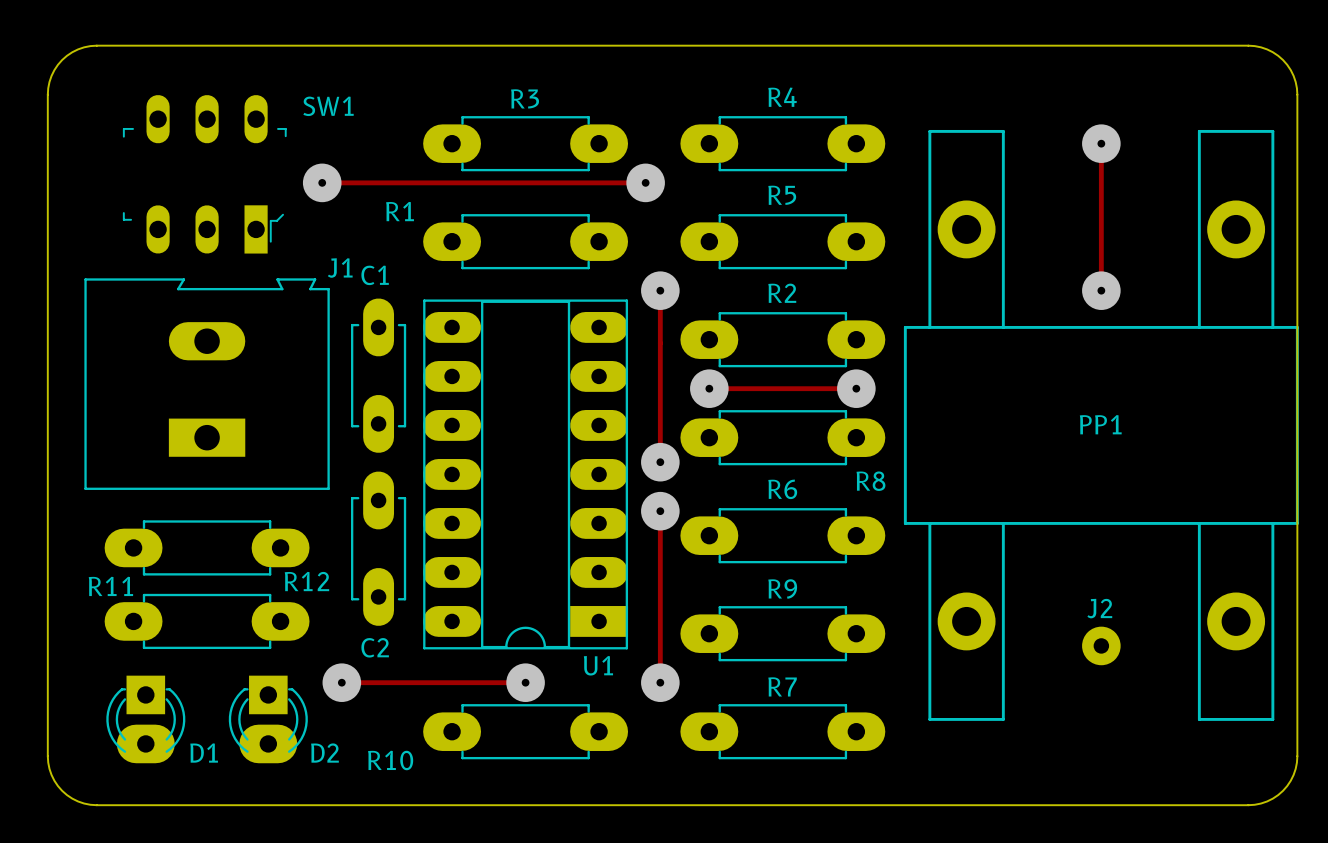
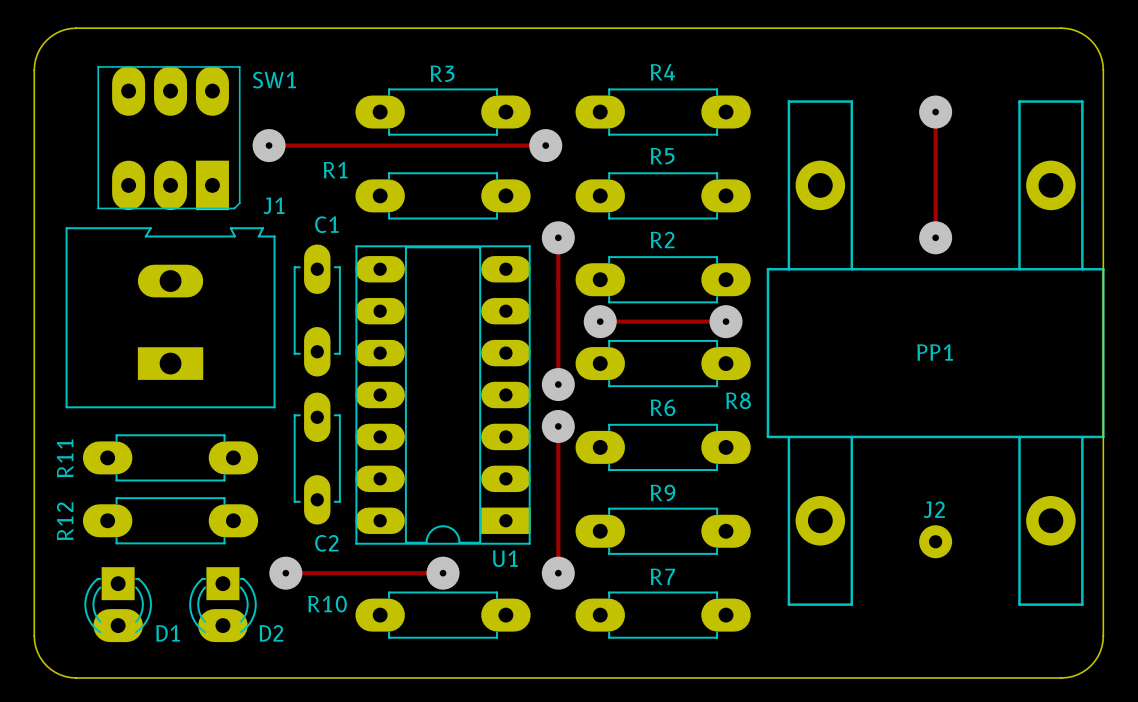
SW1 footprint: [122, 95, 287, 254] -> [97, 66, 241, 211]
J1 name position: J1 (340, 268) -> J1 (273, 205)
C1 name position: C1 (375, 275) -> C1 (326, 224)
R12 name rotation: 0° (306, 581) -> 90° counterclockwise (65, 521)
R12 name position: R12 (306, 581) -> R12 (65, 521)
R11 name rotation: 0° (110, 586) -> 90° counterclockwise (65, 458)
C2 name position: C2 (375, 647) -> C2 (326, 543)
R10 name position: R10 (390, 760) -> R10 (327, 604)

